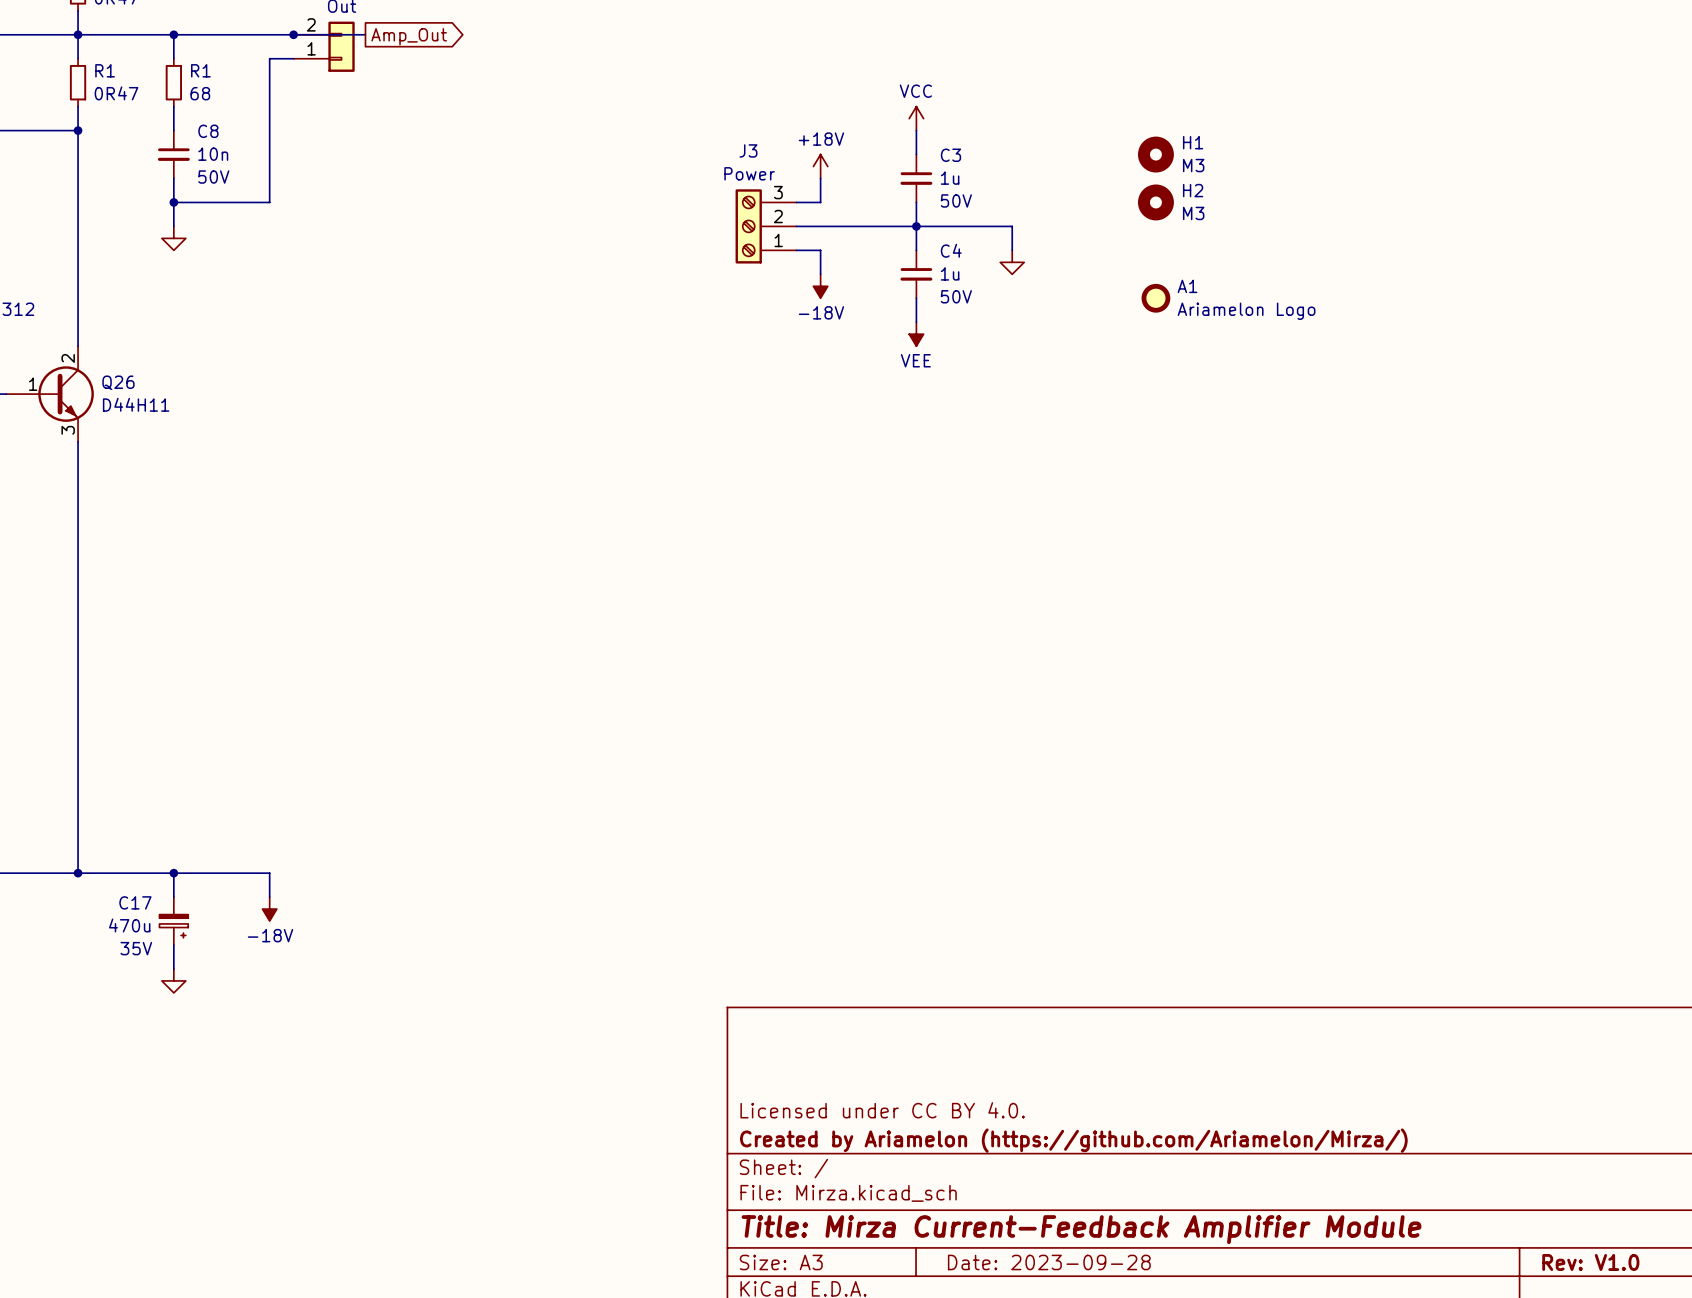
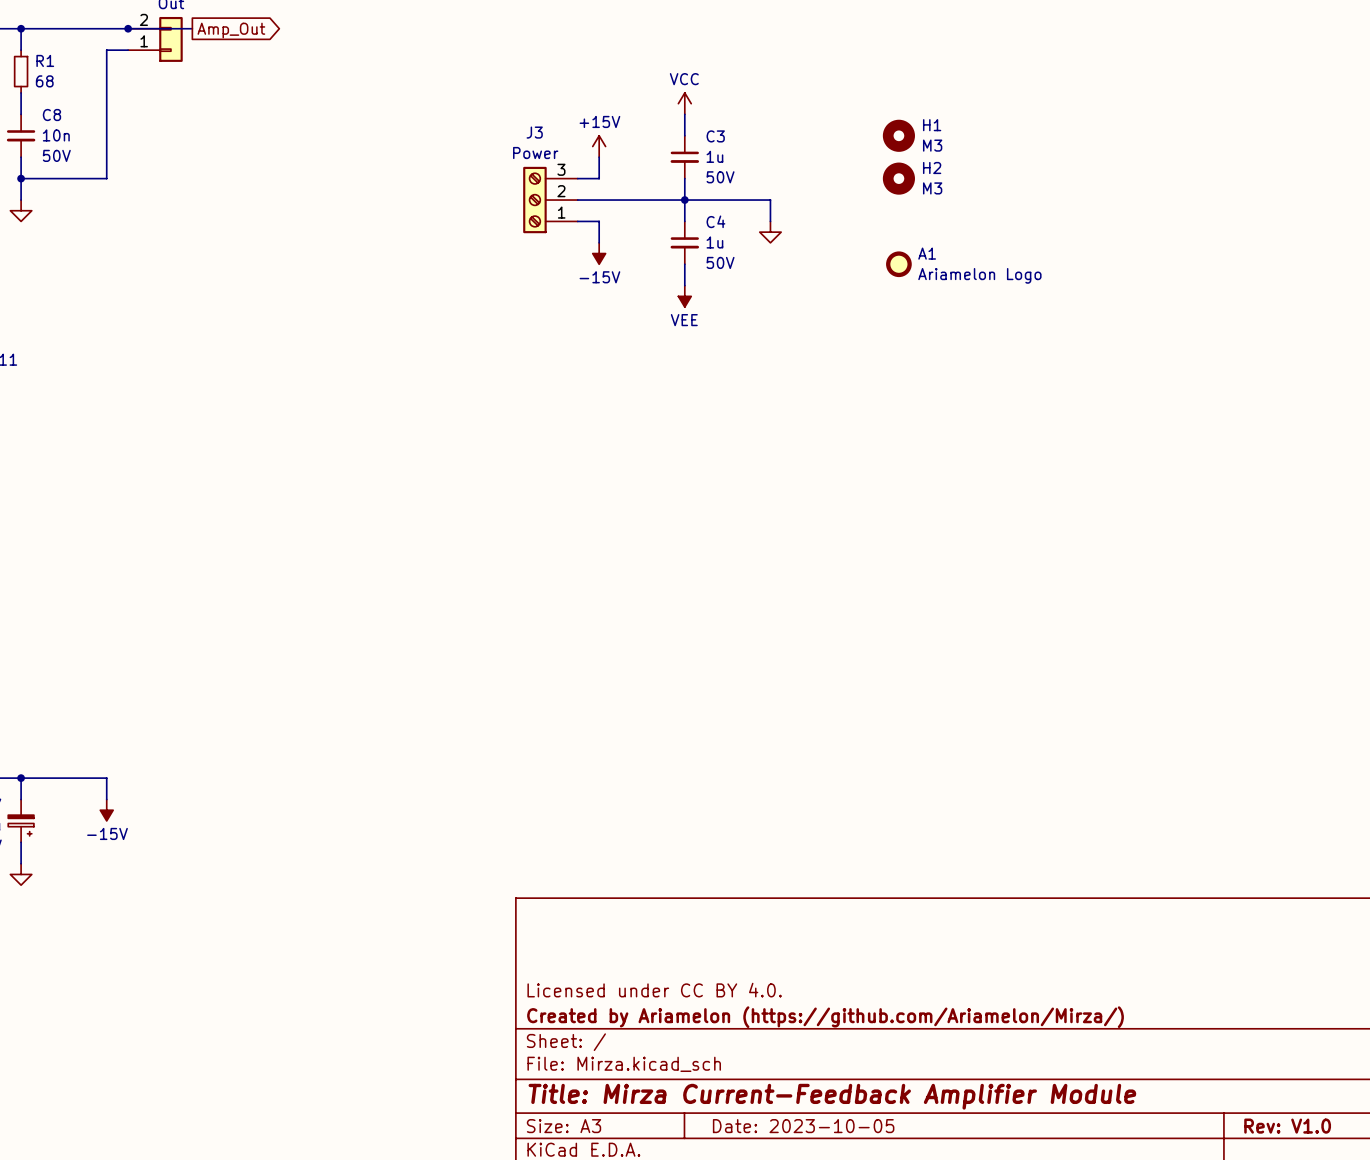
power symbol: +18V (820, 166) -> +15V (599, 146)
power symbol: -18V (820, 286) -> -15V (599, 253)
power symbol: -18V (269, 909) -> -15V (106, 810)
title block: Date: 2023-09-28 (1049, 1262) -> Date: 2023-10-05 (803, 1126)

